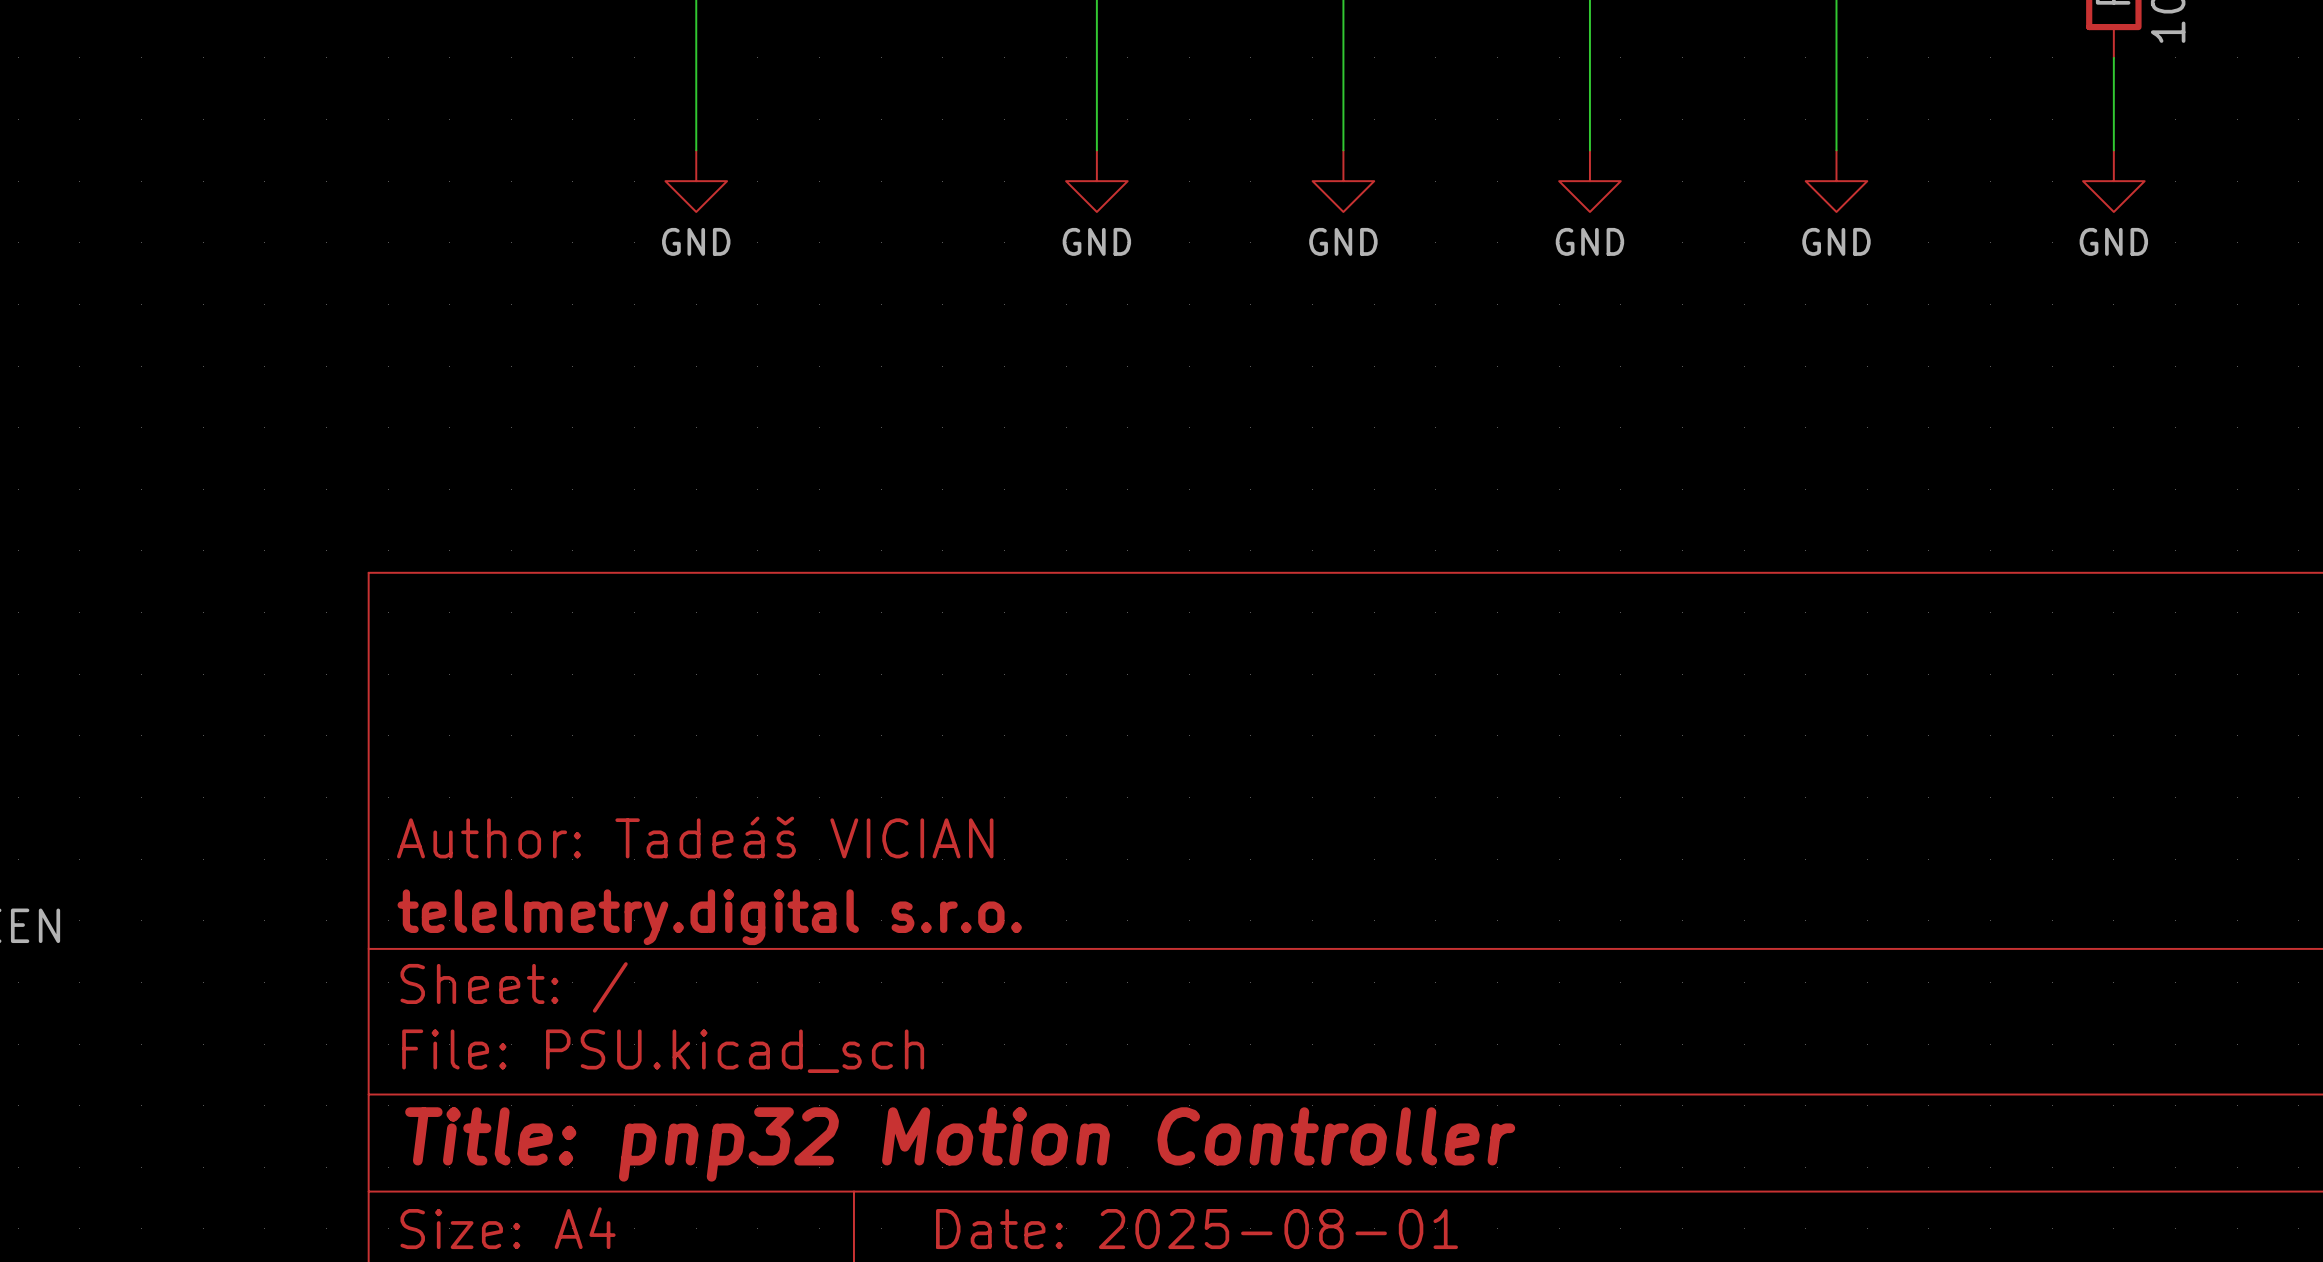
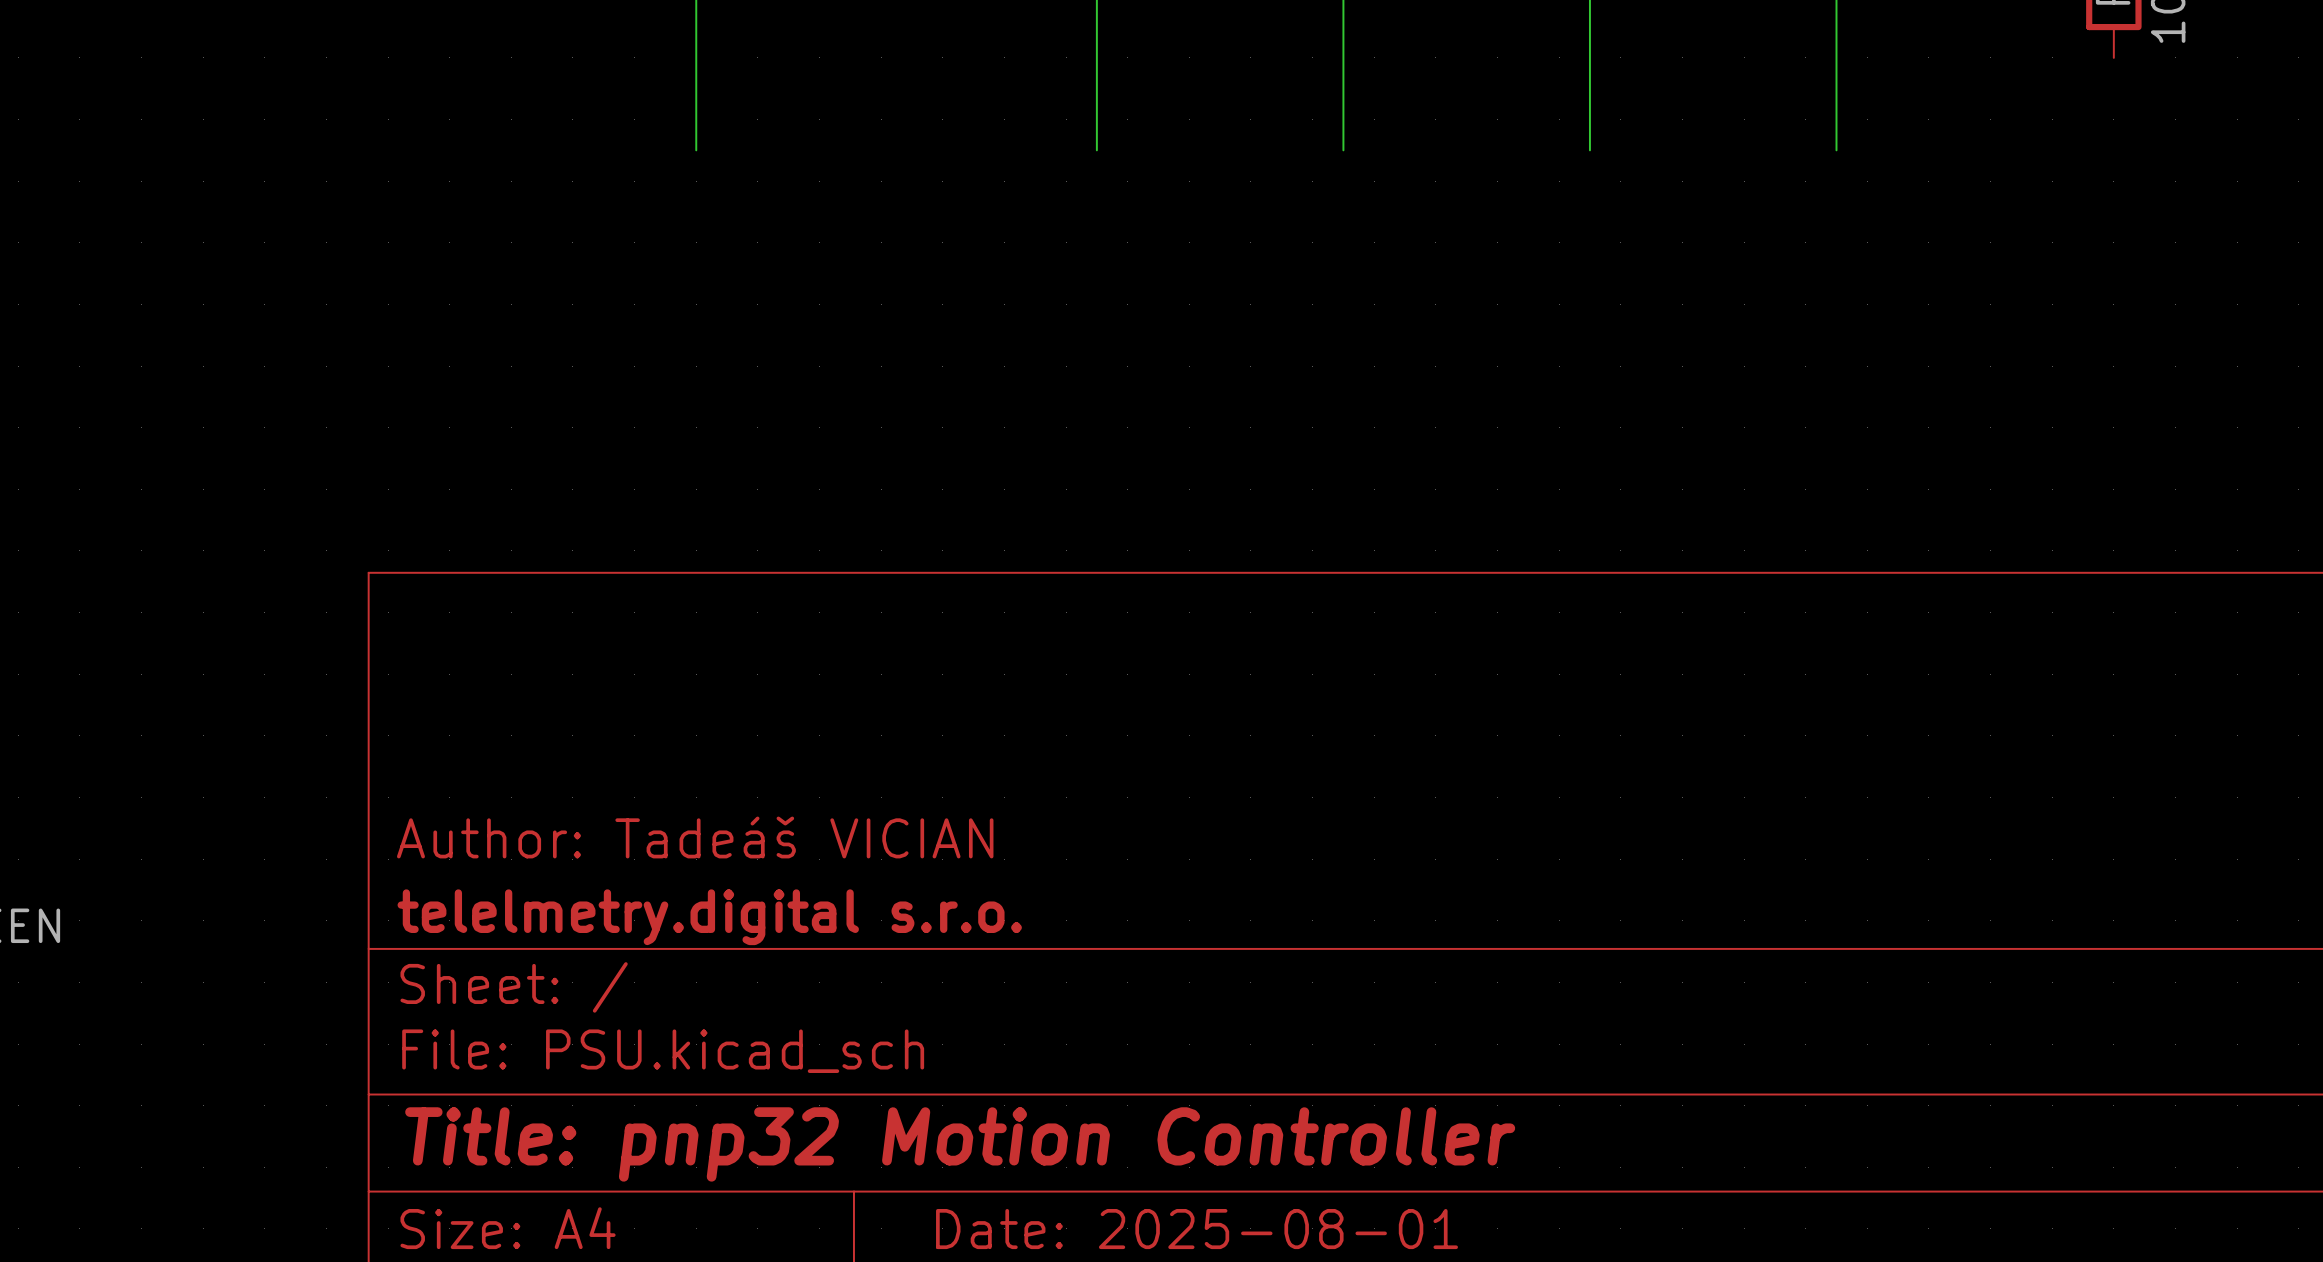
wire: (2113, 57) (2113, 150) -> none
power symbol: GND (696, 181) -> none
power symbol: GND (1096, 181) -> none
power symbol: GND (1343, 181) -> none
power symbol: GND (1589, 181) -> none
power symbol: GND (1836, 181) -> none
power symbol: GND (2113, 181) -> none

